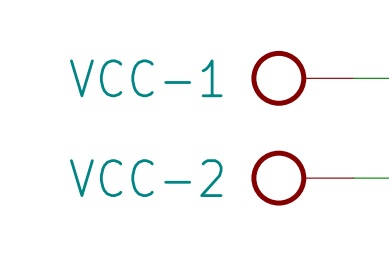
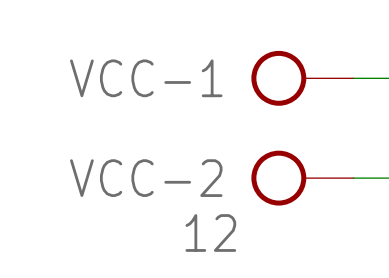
VCC-2 value: none -> 12 (210, 232)

